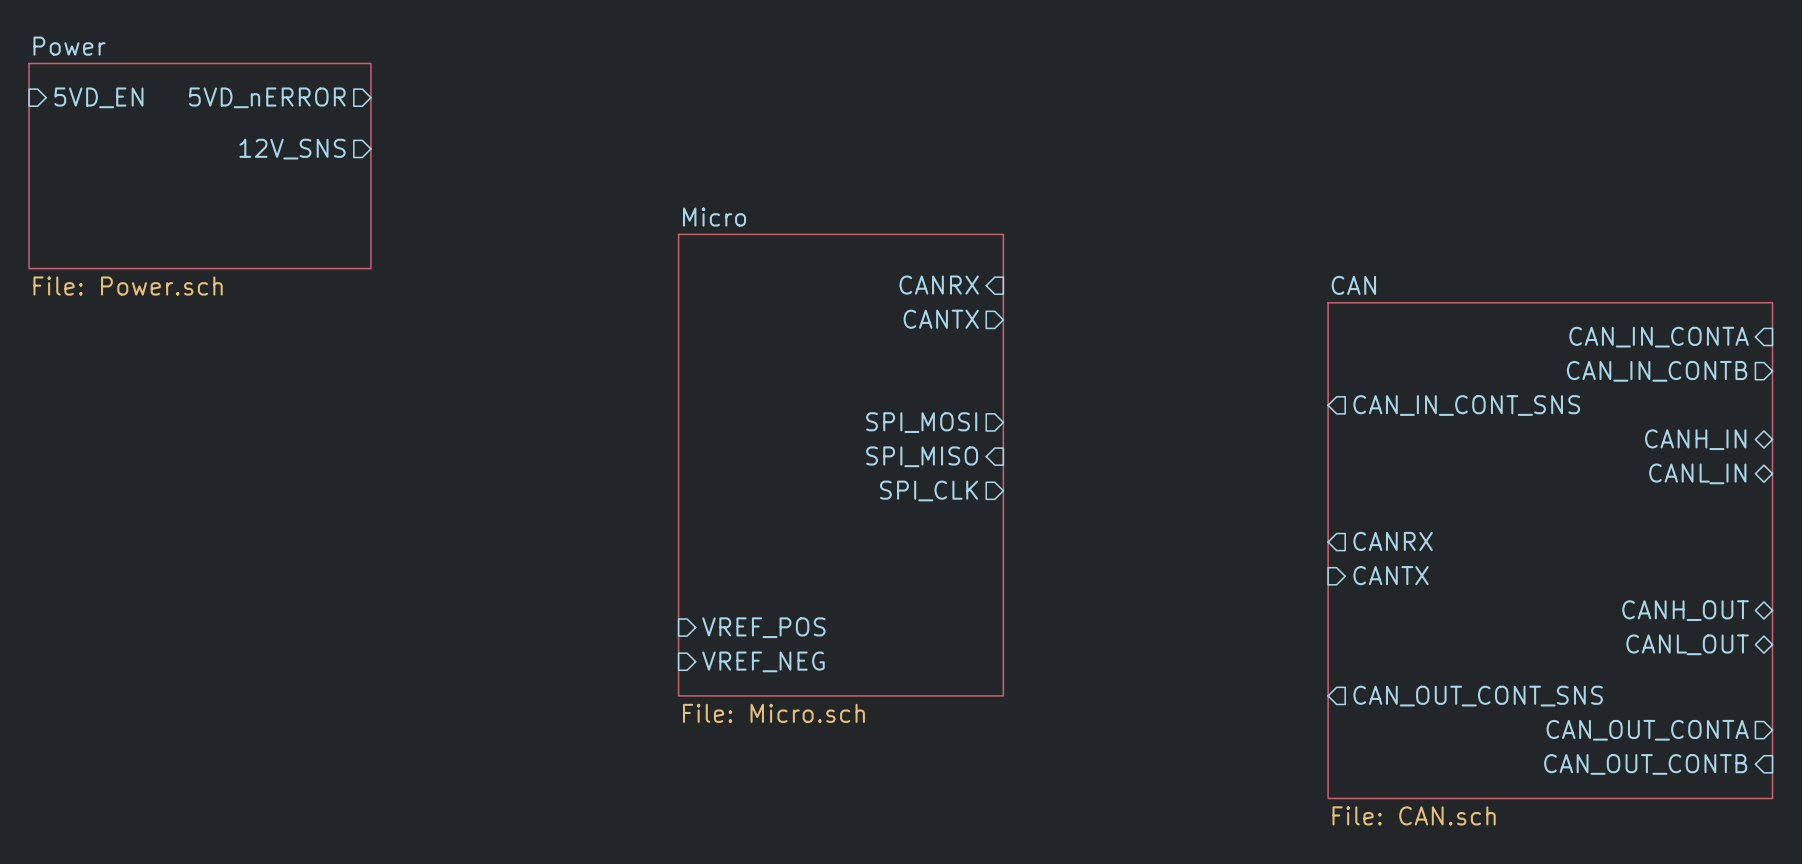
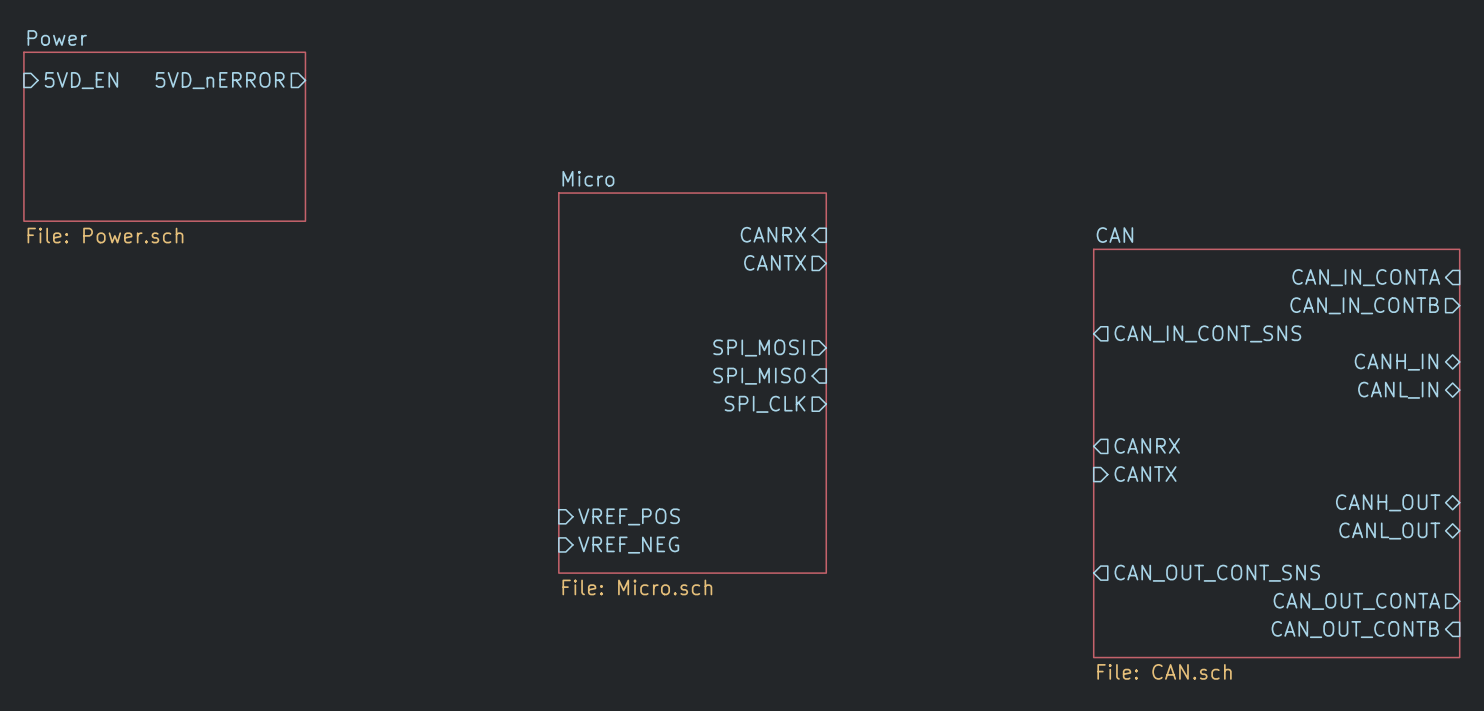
sheet pin: 12V_SNS (292, 149) -> none

